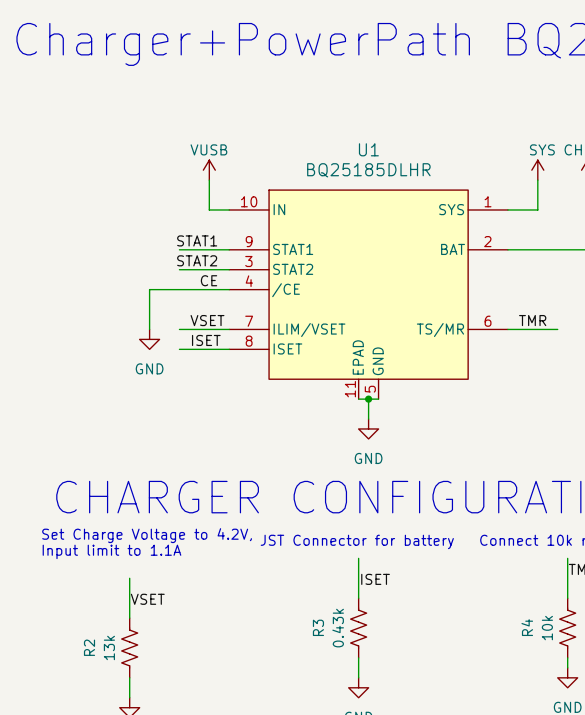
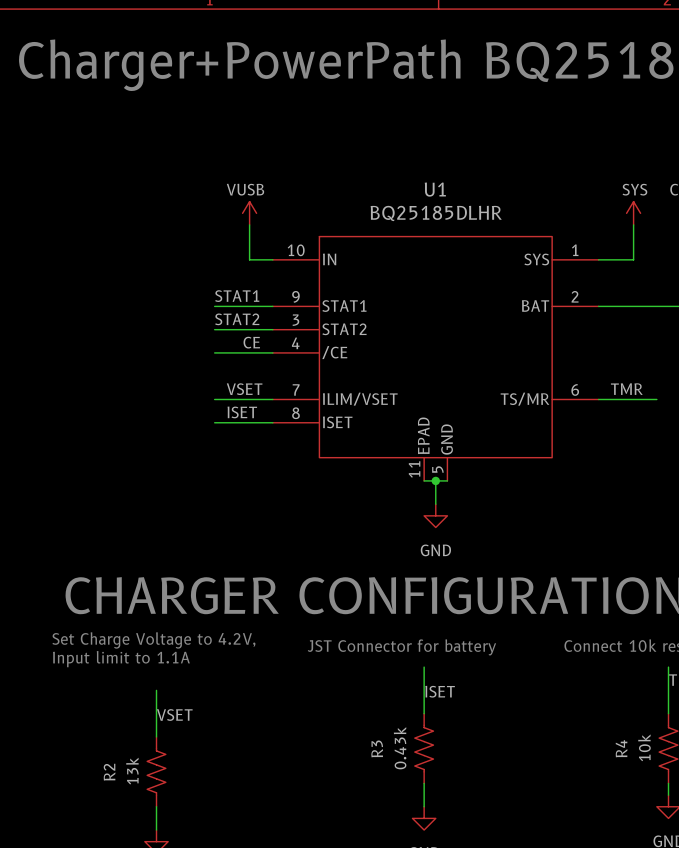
wire: (179, 289) (149, 289) (149, 329) -> none
power symbol: GND (149, 339) -> none

